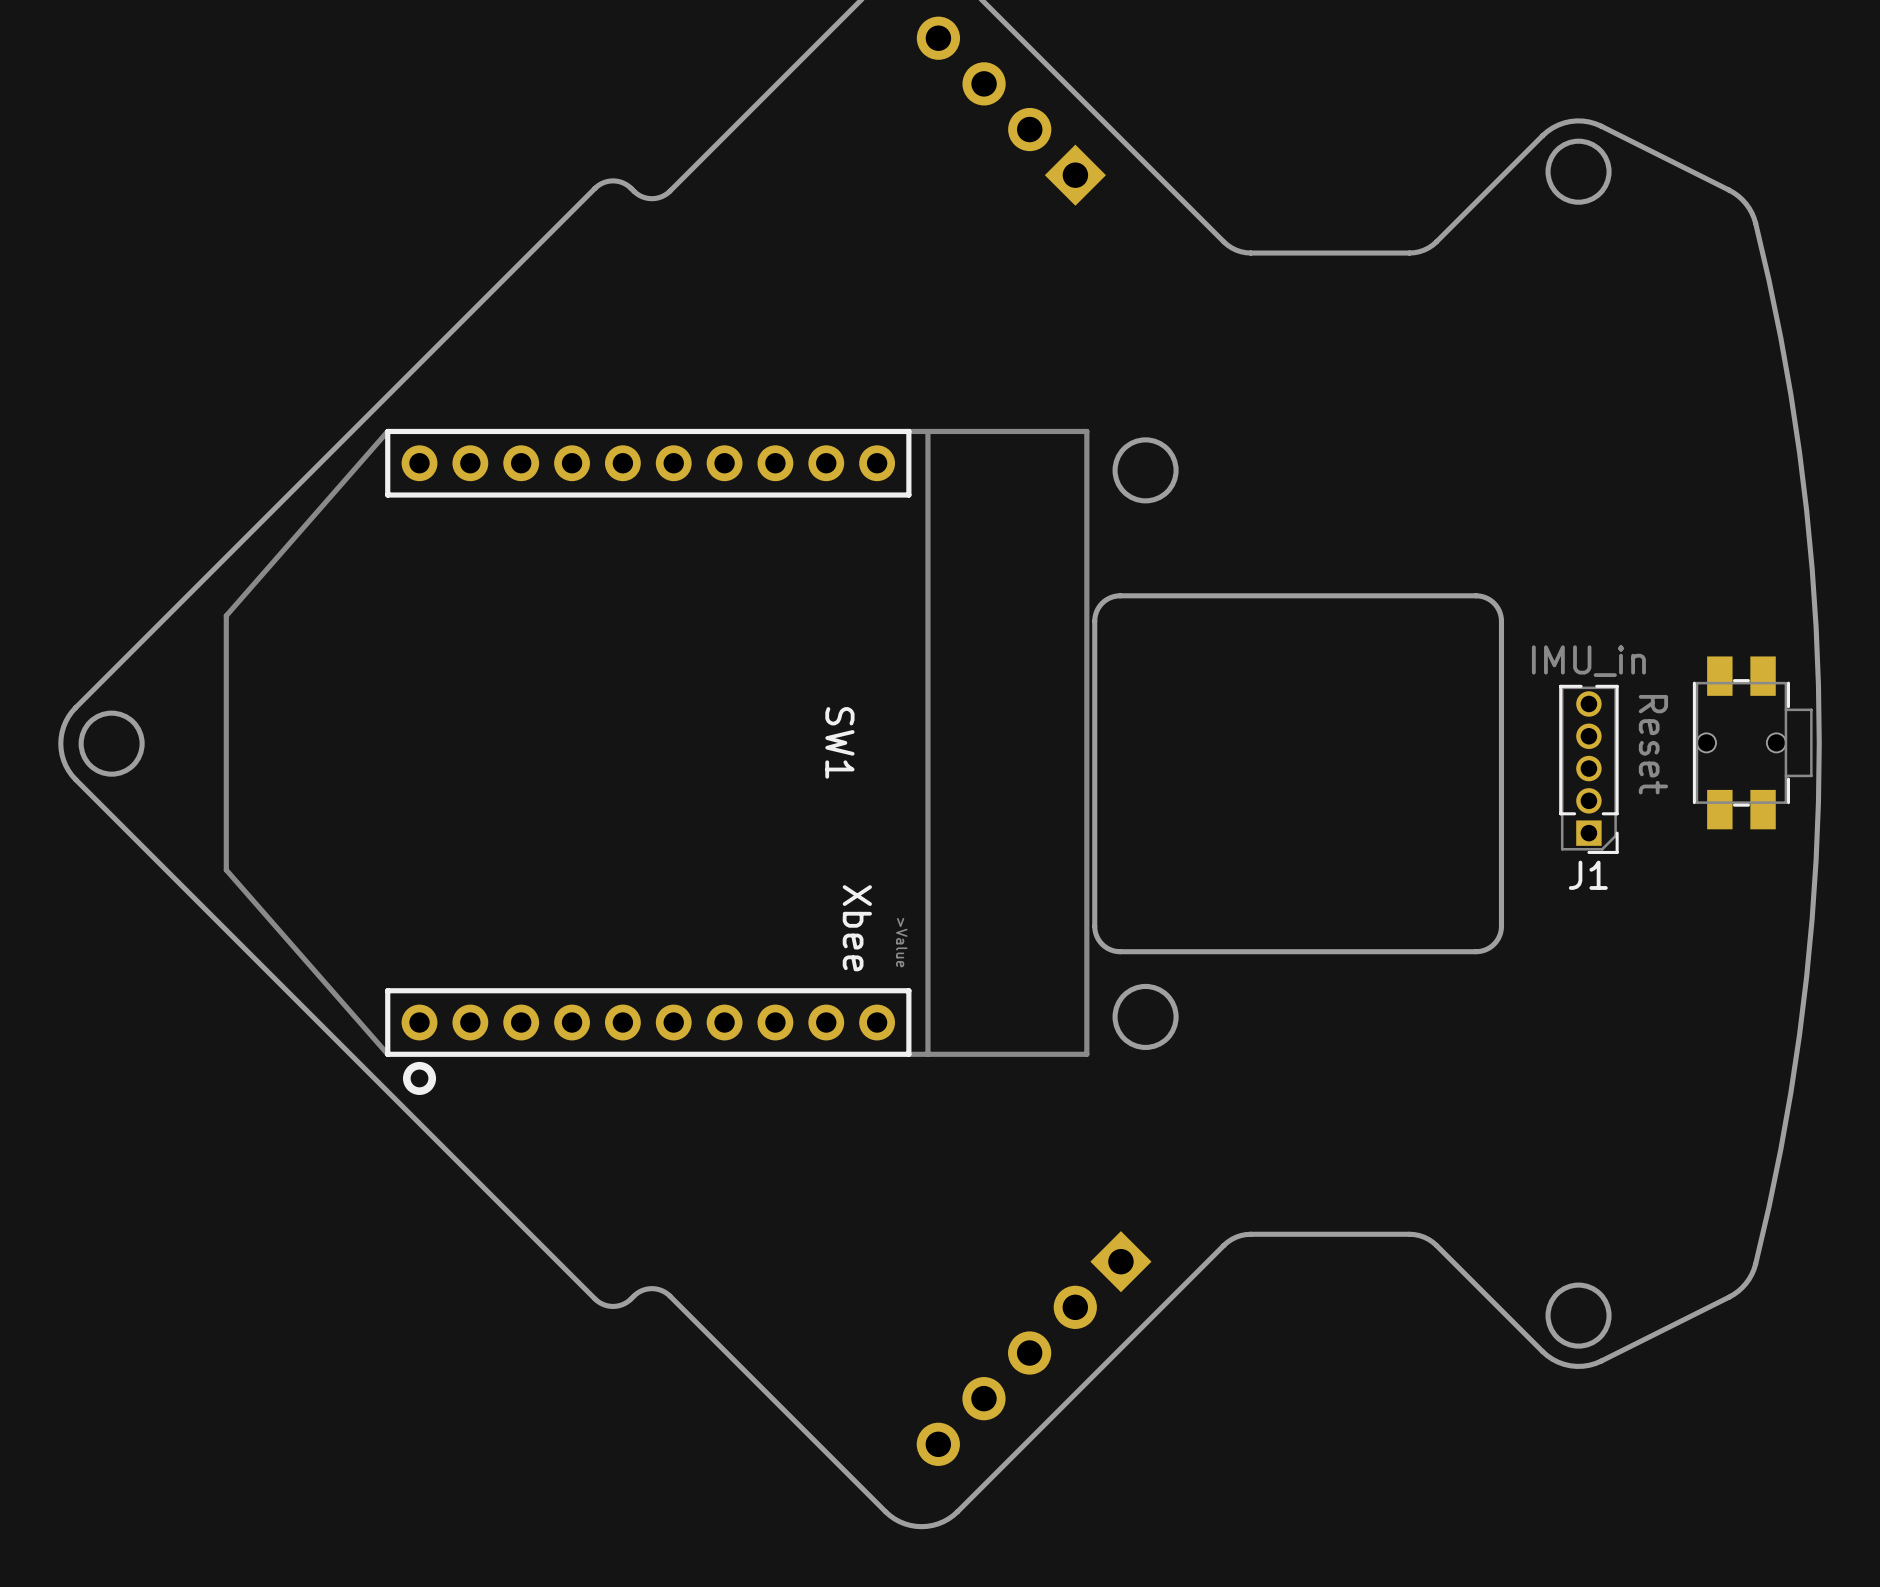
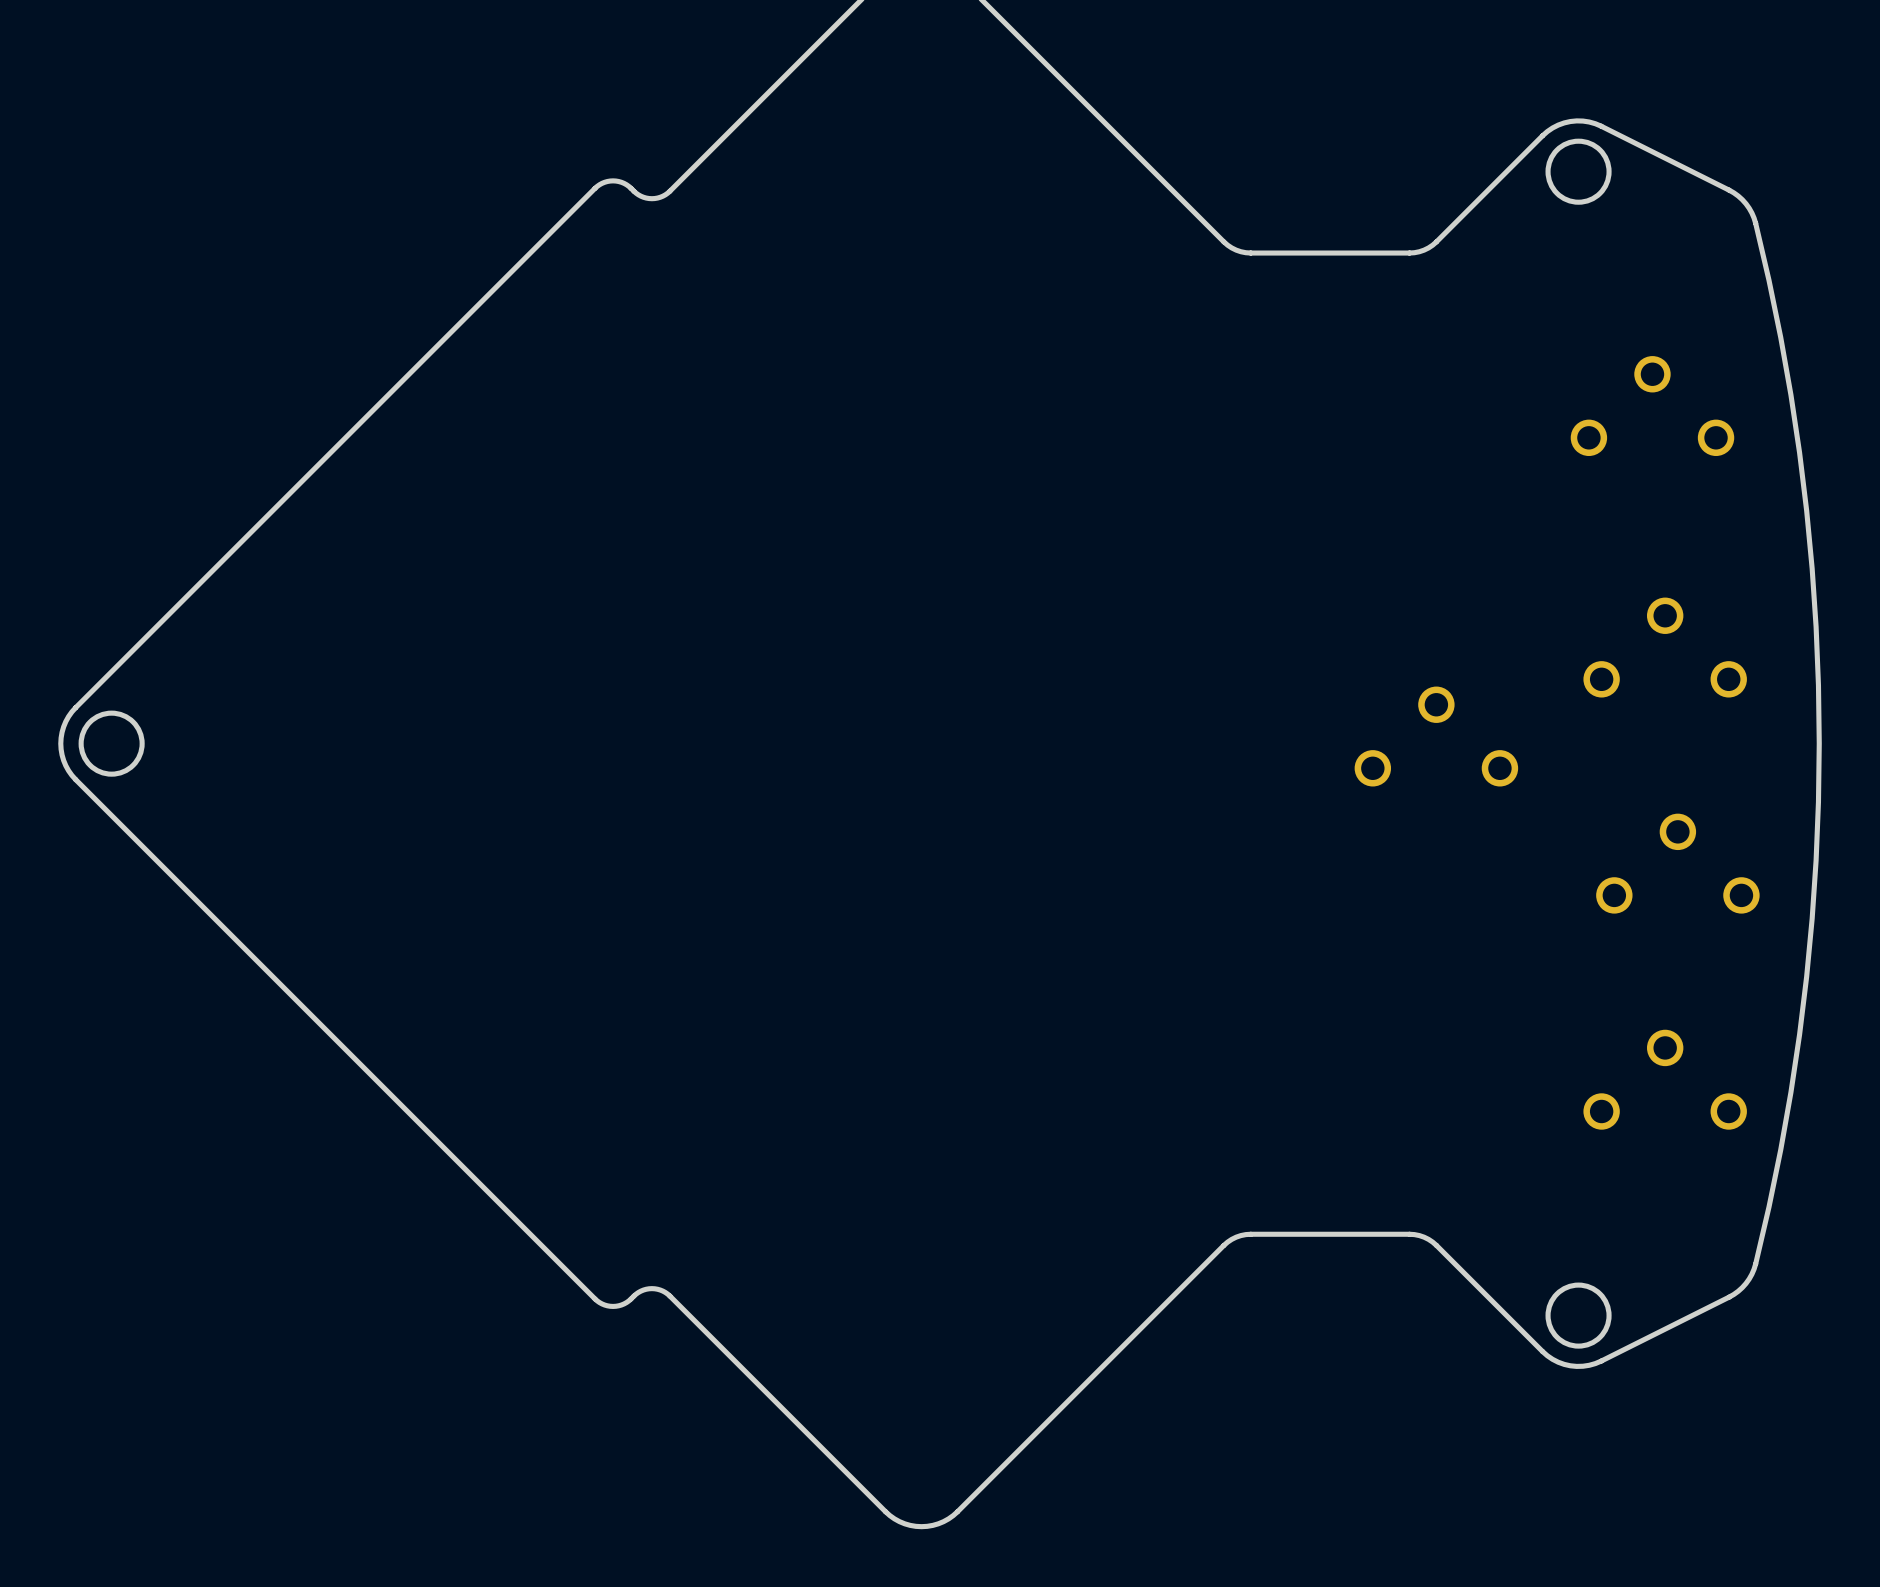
part: (1011, 111) -> none
part: none -> (1652, 406)
round board edge: [1112, 437, 1179, 504] -> none
board edge: (1476, 595) (1120, 595) (1111, 597) (1102, 603) (1096, 612) (1094, 621) (1094, 926) (1096, 934) (1102, 944) (1109, 949) (1120, 951) (1476, 951) (1484, 950) (1494, 944) (1498, 937) (1501, 926) (1501, 621) (1500, 612) (1494, 603) (1487, 598) (1476, 595) -> none
part: none -> (1665, 647)
part: none -> (1436, 736)
SW1: Reset (1752, 742) -> none
part: (656, 761) -> none
J1: IMU_in (1588, 769) -> none
part: none -> (1677, 863)
round board edge: [1112, 983, 1179, 1050] -> none
part: none -> (1665, 1079)
part: (1034, 1348) -> none

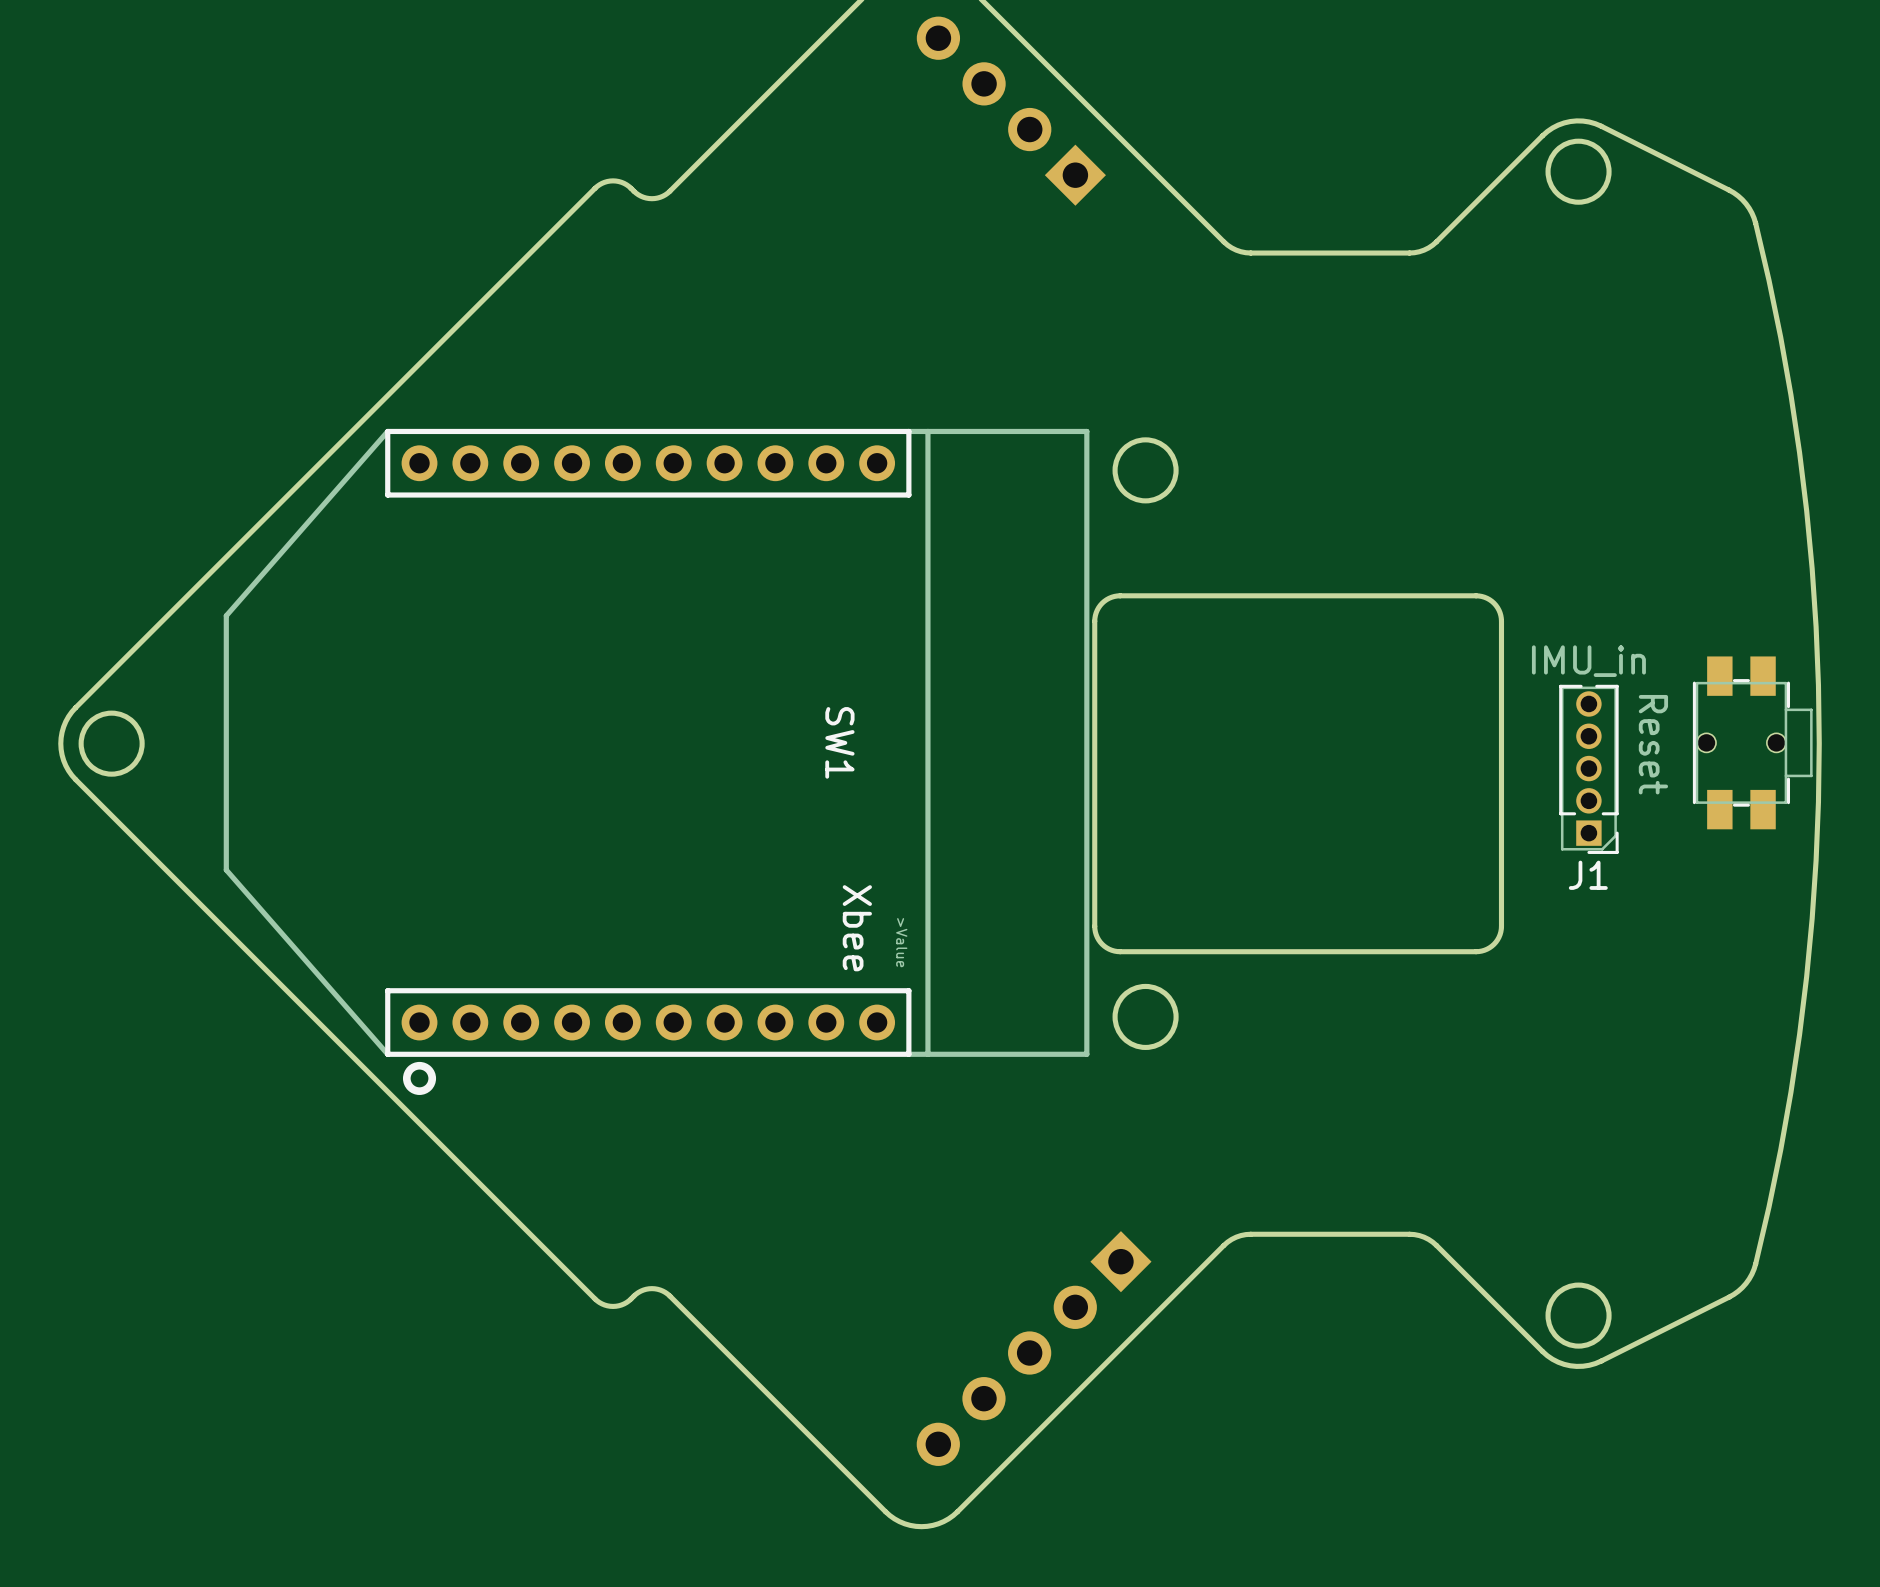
part: none -> (1011, 111)
part: (1652, 406) -> none
round board edge: none -> [1112, 437, 1179, 504]
board edge: none -> (1476, 595) (1120, 595) (1111, 597) (1102, 603) (1096, 612) (1094, 621) (1094, 926) (1096, 934) (1102, 944) (1109, 949) (1120, 951) (1476, 951) (1484, 950) (1494, 944) (1498, 937) (1501, 926) (1501, 621) (1500, 612) (1494, 603) (1487, 598) (1476, 595)
part: (1665, 647) -> none
part: (1436, 736) -> none
SW1: none -> Reset (1752, 742)
part: none -> (656, 761)
J1: none -> IMU_in (1588, 769)
part: (1677, 863) -> none
round board edge: none -> [1112, 983, 1179, 1050]
part: (1665, 1079) -> none
part: none -> (1034, 1348)

